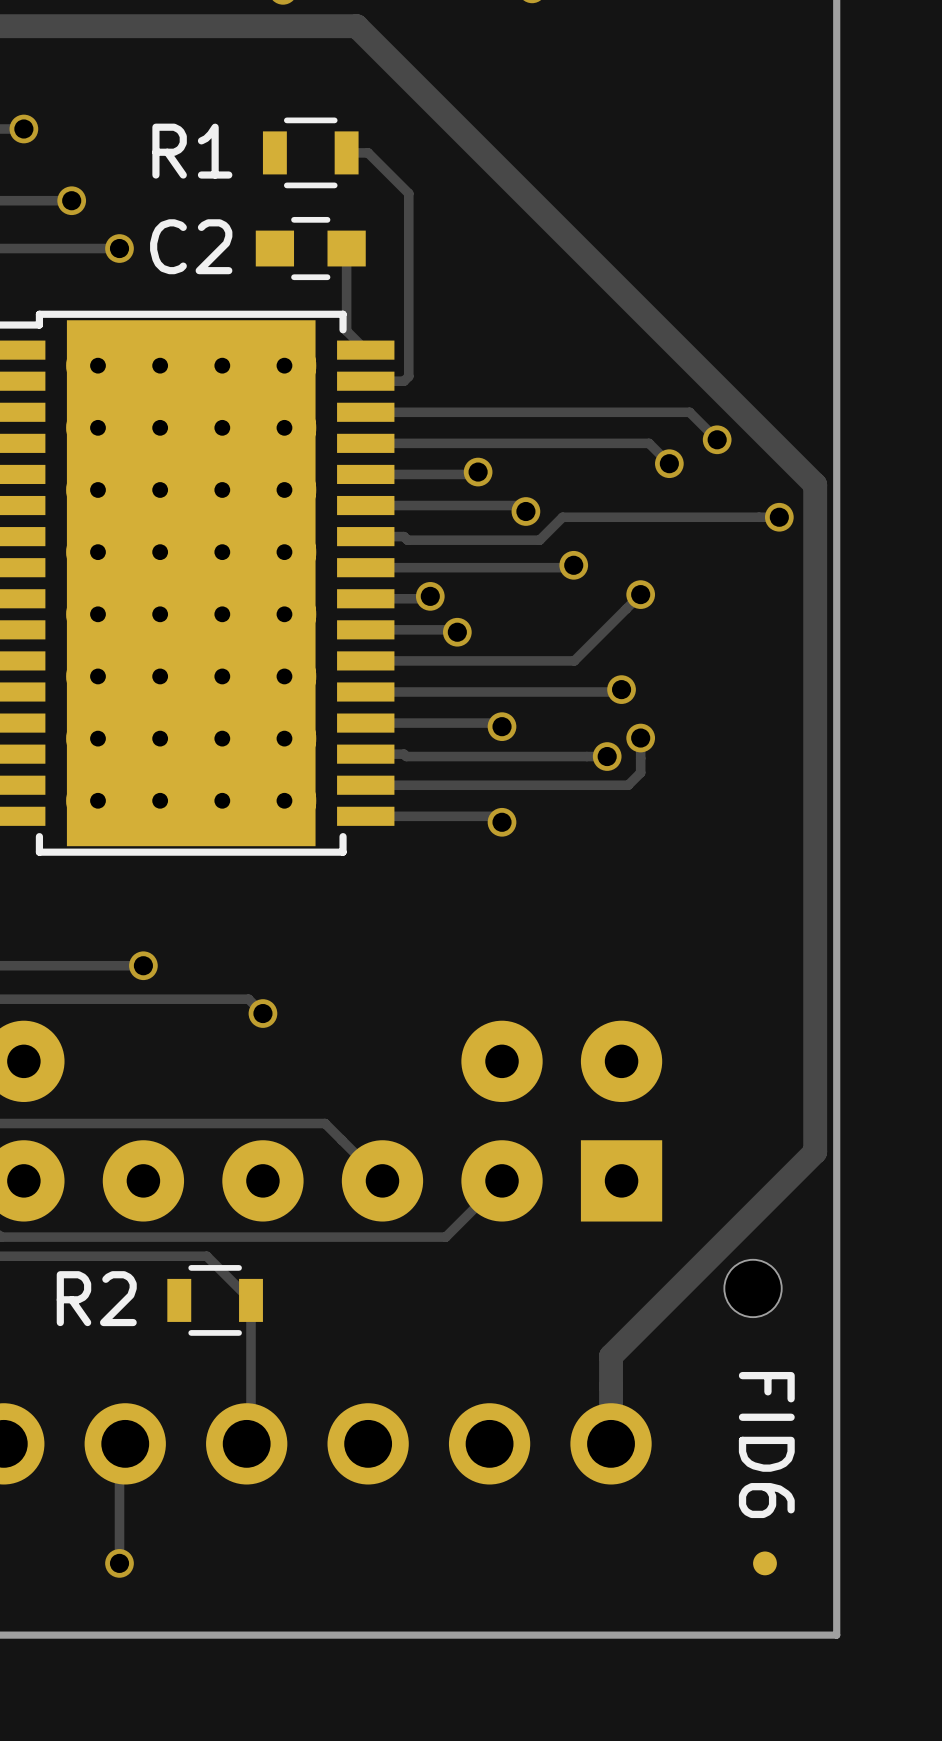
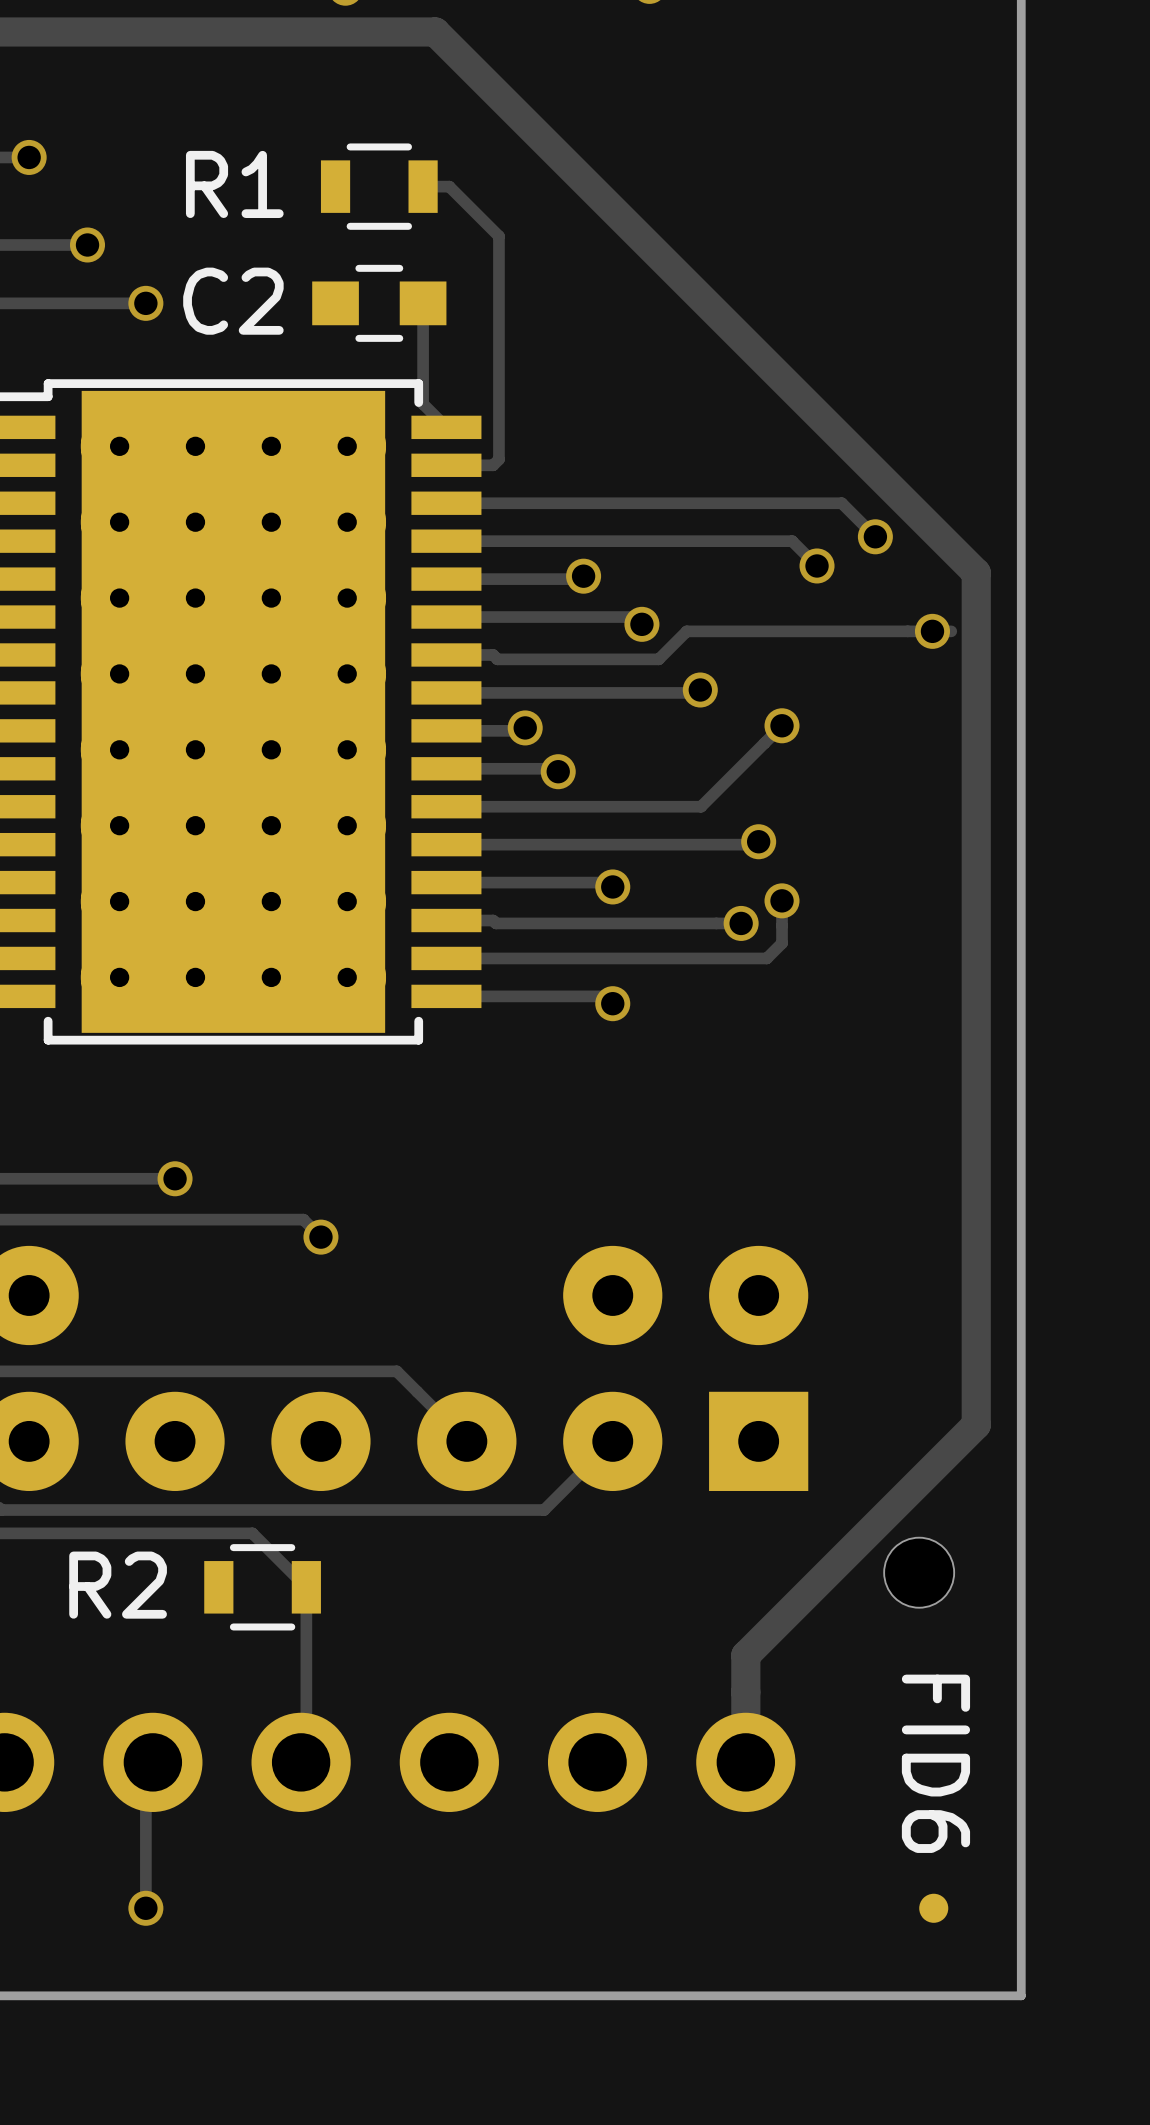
track: (799, 469) (815, 484) (815, 1152) (799, 1167) -> (976, 572) (976, 1424)
via position: (779, 517) -> (932, 631)

